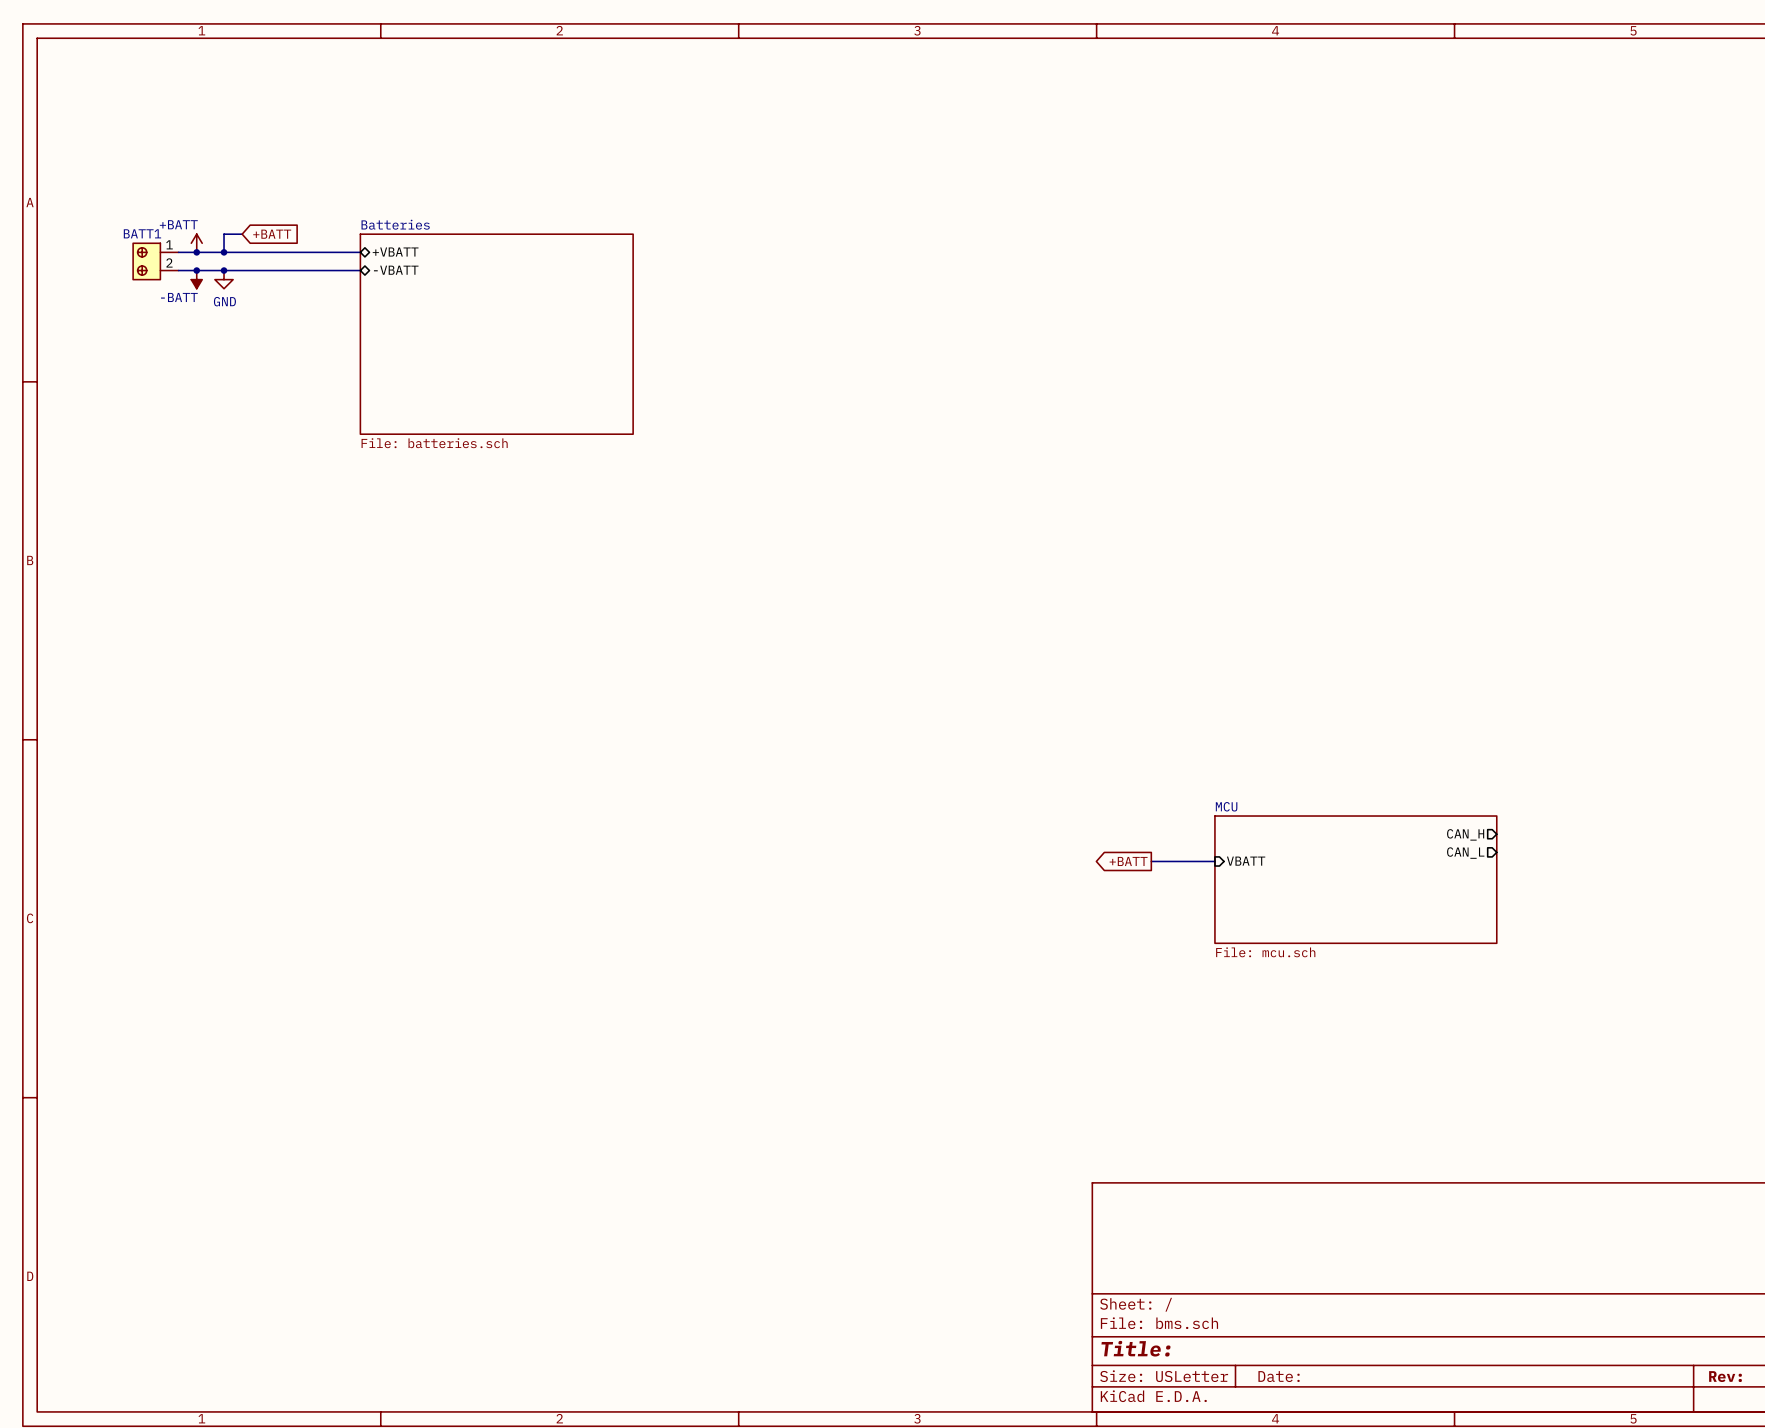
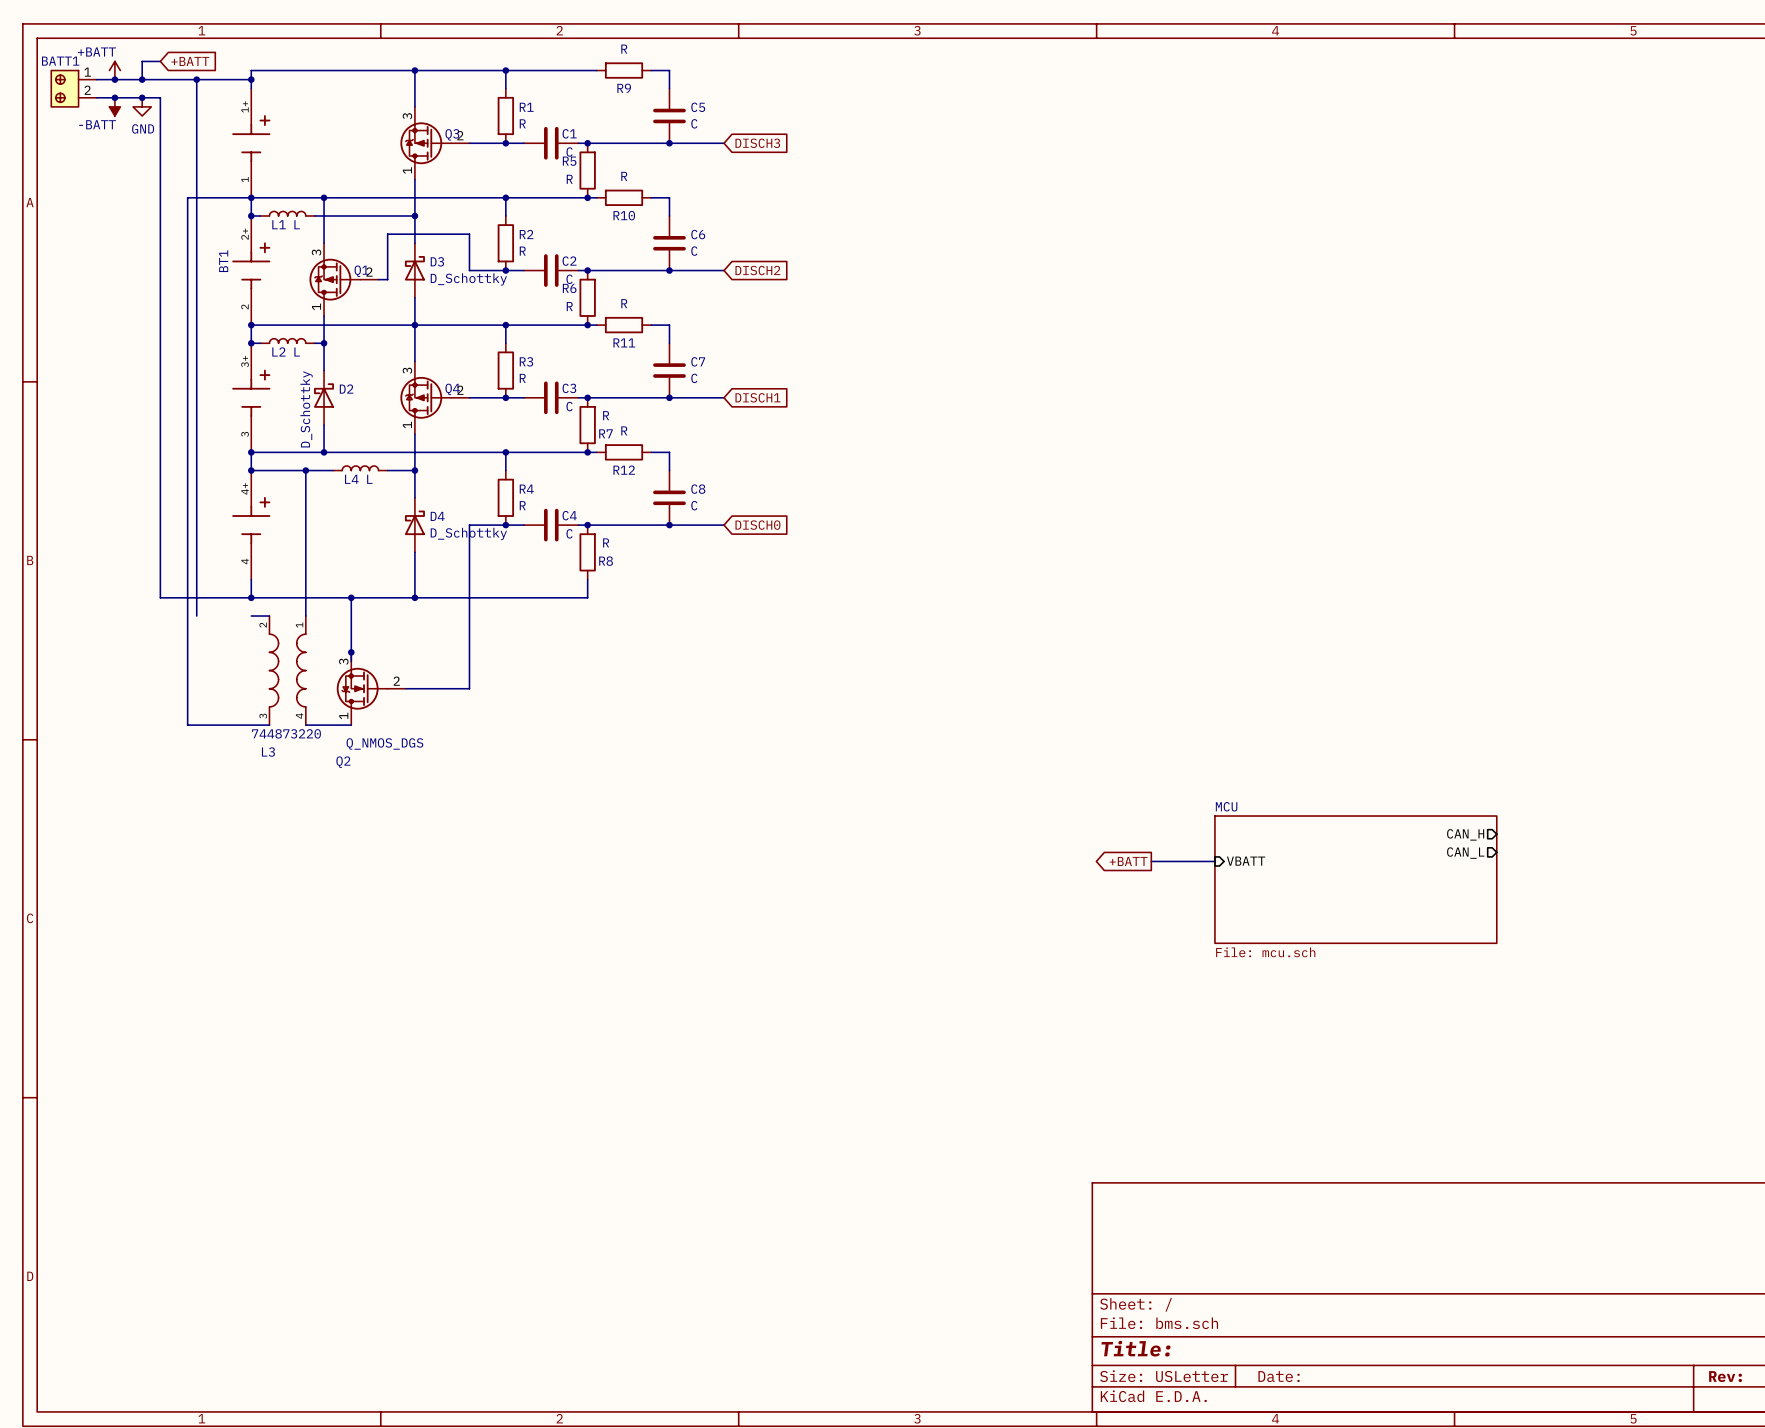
wire: none -> (160, 61) (142, 61) (142, 79)
global label: none -> +BATT (190, 61)
power symbol: none -> +BATT (114, 70)
wire: none -> (414, 70) (414, 106)
junction: none -> (414, 70)
wire: none -> (505, 70) (505, 88)
junction: none -> (505, 70)
wire: none -> (596, 70) (251, 70) (251, 88)
R9: none -> R (624, 70)
wire: none -> (651, 70) (669, 70) (669, 88)
wire: none -> (96, 79) (251, 79)
junction: none -> (114, 79)
junction: none -> (142, 79)
wire: none -> (196, 79) (196, 616)
junction: none -> (196, 79)
junction: none -> (251, 79)
wire: none -> (96, 97) (160, 97) (160, 597) (587, 597) (587, 579)
junction: none -> (114, 97)
junction: none -> (142, 97)
power symbol: none -> -BATT (114, 106)
power symbol: none -> GND (142, 106)
R1: none -> R (505, 115)
C5: none -> C (669, 115)
Q3: none -> (434, 143)
wire: none -> (469, 143) (524, 143)
junction: none -> (505, 143)
C1: none -> C (551, 143)
wire: none -> (578, 143) (724, 143)
junction: none -> (587, 143)
junction: none -> (669, 143)
global label: none -> DISCH3 (757, 143)
R5: none -> R (587, 170)
wire: none -> (414, 179) (414, 243)
wire: none -> (251, 197) (251, 216) (260, 216)
junction: none -> (251, 197)
wire: none -> (324, 197) (324, 243)
junction: none -> (324, 197)
wire: none -> (505, 197) (505, 216)
junction: none -> (505, 197)
junction: none -> (587, 197)
wire: none -> (596, 197) (187, 197) (187, 725) (269, 725)
R10: none -> R (624, 197)
wire: none -> (651, 197) (669, 197) (669, 216)
L1: none -> L (287, 213)
junction: none -> (251, 216)
wire: none -> (314, 216) (414, 216)
junction: none -> (414, 216)
wire: (242, 234) (224, 234) (224, 252) -> none
global label: +BATT (272, 234) -> none
power symbol: +BATT (196, 243) -> none
R2: none -> R (505, 243)
C6: none -> C (669, 243)
wire: (178, 252) (360, 252) -> none
junction: (196, 252) -> none
junction: (224, 252) -> none
sheet pin: +VBATT (395, 252) -> none
BATT1 position: (155, 261) -> (74, 88)
wire: (178, 270) (360, 270) -> none
junction: (196, 270) -> none
junction: (224, 270) -> none
sheet pin: -VBATT (396, 270) -> none
D3: none -> D_Schottky (414, 270)
junction: none -> (505, 270)
wire: none -> (524, 270) (469, 270) (469, 234) (387, 234) (387, 279) (378, 279)
C2: none -> C (551, 270)
wire: none -> (578, 270) (724, 270)
junction: none -> (587, 270)
junction: none -> (669, 270)
global label: none -> DISCH2 (757, 270)
power symbol: -BATT (196, 279) -> none
power symbol: GND (224, 279) -> none
Q1: none -> (344, 279)
wire: none -> (414, 297) (414, 361)
R6: none -> R (587, 297)
wire: none -> (324, 316) (324, 370)
junction: none -> (251, 325)
junction: none -> (414, 325)
wire: none -> (505, 325) (505, 343)
junction: none -> (505, 325)
junction: none -> (587, 325)
wire: none -> (596, 325) (251, 325) (251, 343) (260, 343)
R11: none -> R (624, 325)
wire: none -> (651, 325) (669, 325) (669, 343)
BT1: none -> (251, 334)
sheet Batteries: File: batteries.sch (496, 334) -> none
L2: none -> L (287, 341)
junction: none -> (251, 343)
wire: none -> (314, 343) (324, 343)
junction: none -> (324, 343)
R3: none -> R (505, 370)
C7: none -> C (669, 370)
D2: none -> D_Schottky (324, 397)
Q4: none -> (434, 397)
wire: none -> (469, 397) (524, 397)
junction: none -> (505, 397)
C3: none -> C (551, 397)
wire: none -> (578, 397) (724, 397)
junction: none -> (587, 397)
junction: none -> (669, 397)
global label: none -> DISCH1 (758, 397)
wire: none -> (324, 425) (324, 452)
R7: none -> R (587, 425)
wire: none -> (414, 434) (414, 497)
junction: none -> (251, 452)
junction: none -> (324, 452)
wire: none -> (505, 452) (505, 470)
junction: none -> (505, 452)
junction: none -> (587, 452)
wire: none -> (596, 452) (251, 452) (251, 470) (333, 470)
R12: none -> R (624, 452)
wire: none -> (651, 452) (669, 452) (669, 470)
L4: none -> L (360, 468)
junction: none -> (251, 470)
wire: none -> (305, 470) (305, 616)
junction: none -> (305, 470)
wire: none -> (387, 470) (414, 470)
junction: none -> (414, 470)
R4: none -> R (505, 497)
C8: none -> C (669, 497)
D4: none -> D_Schottky (414, 525)
junction: none -> (505, 525)
wire: none -> (524, 525) (469, 525) (469, 688) (405, 688)
C4: none -> C (551, 525)
wire: none -> (578, 525) (724, 525)
junction: none -> (587, 525)
junction: none -> (669, 525)
global label: none -> DISCH0 (757, 525)
wire: none -> (414, 552) (414, 597)
R8: none -> R (587, 552)
wire: none -> (251, 579) (251, 597)
junction: none -> (251, 597)
wire: none -> (351, 597) (351, 661)
junction: none -> (351, 597)
junction: none -> (414, 597)
wire: none -> (251, 616) (269, 616)
junction: none -> (351, 652)
L3: none -> 744873220 (287, 670)
Q2: none -> Q_NMOS_DGS (371, 688)
wire: none -> (305, 725) (351, 725)

